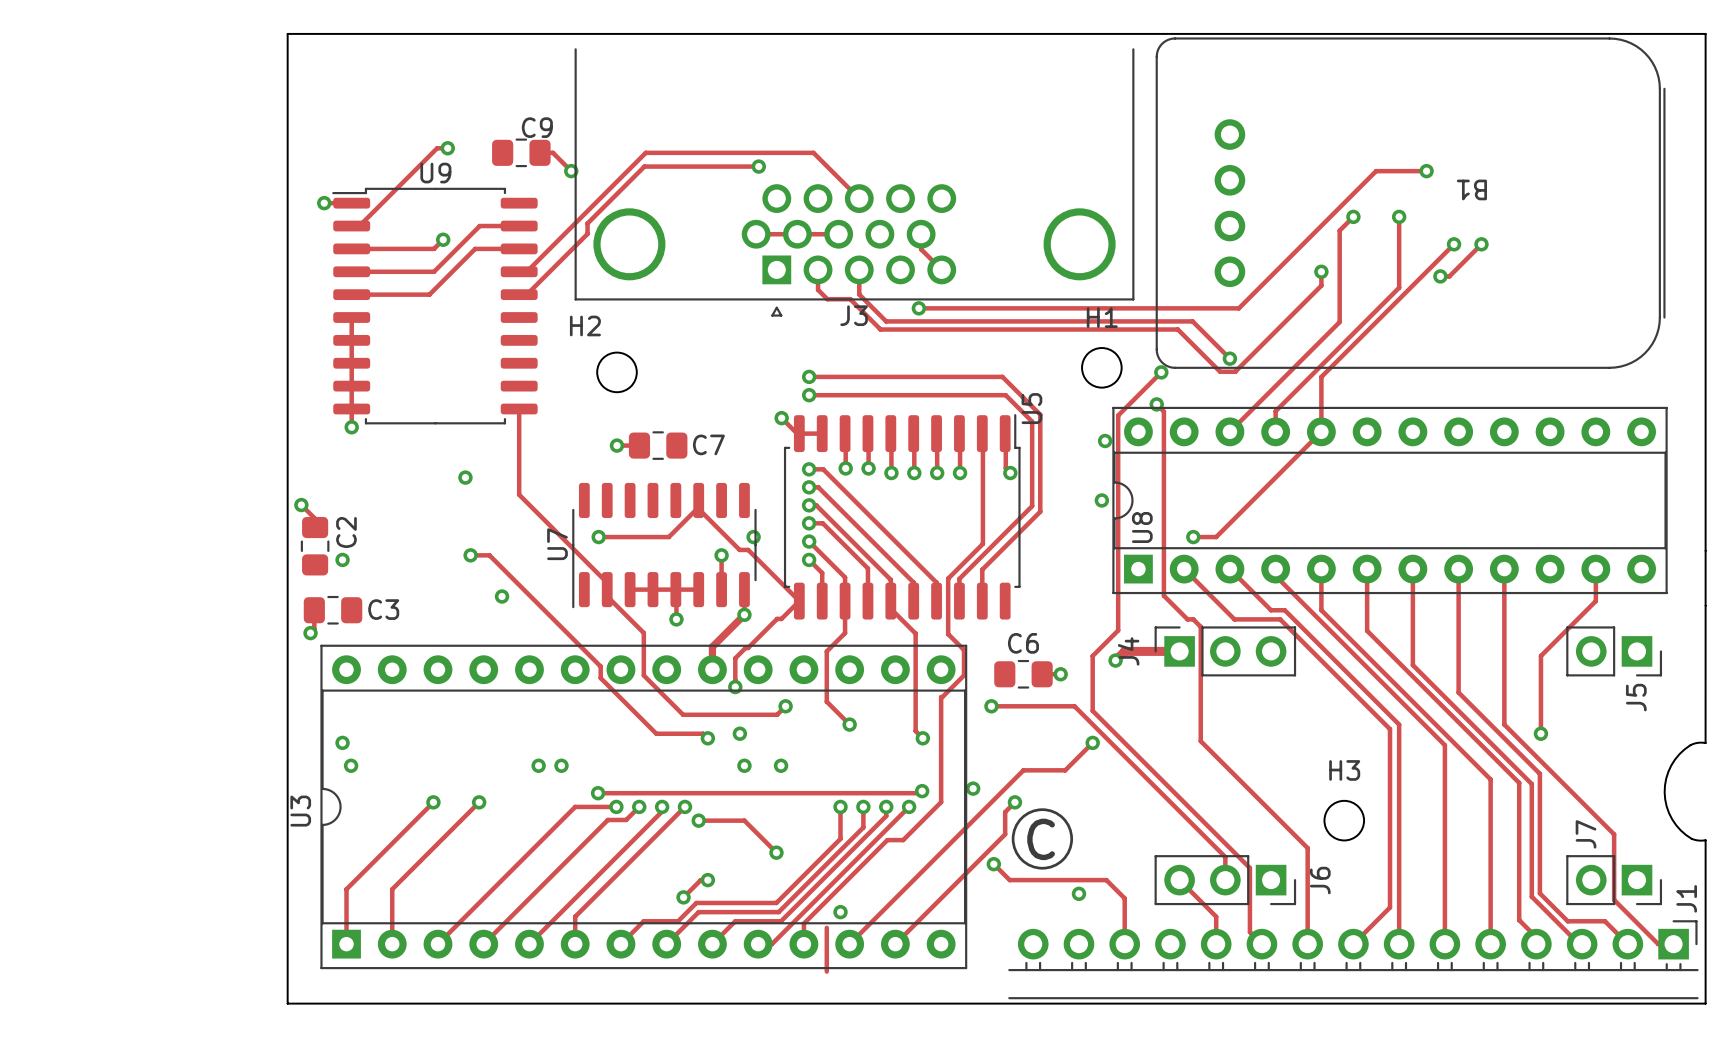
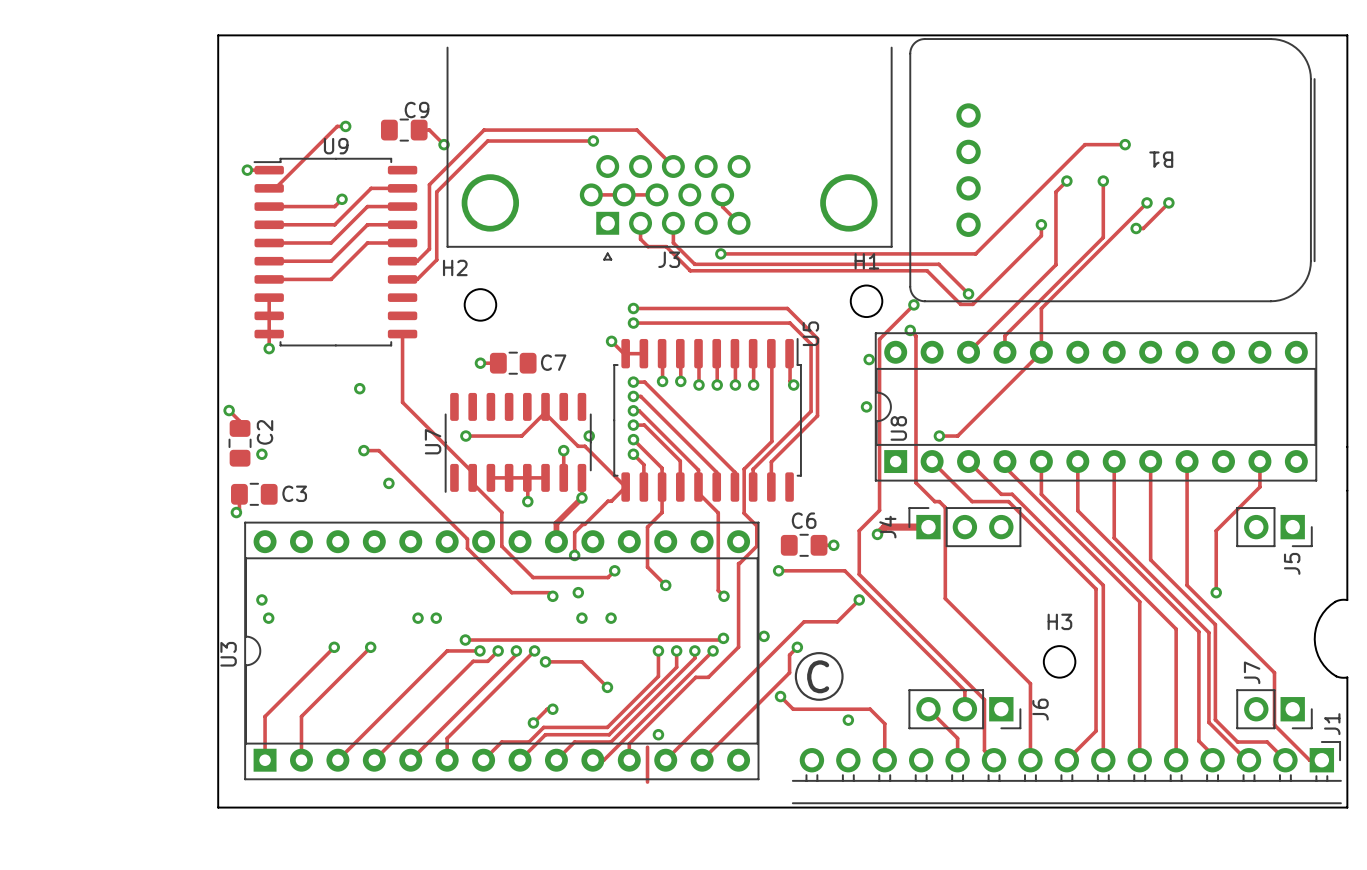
track: (645, 152) (526, 271) -> (503, 130) (484, 130) (429, 184) (429, 249) (417, 261) (402, 261)
track: (644, 166) (587, 223) (587, 233) (526, 294) -> (502, 141) (487, 141) (436, 192) (436, 259) (417, 279) (402, 279)
track: none -> (402, 242) (367, 242) (331, 279) (269, 279)
track: (351, 317) (351, 363) -> (269, 261) (331, 261) (367, 224) (402, 224)

